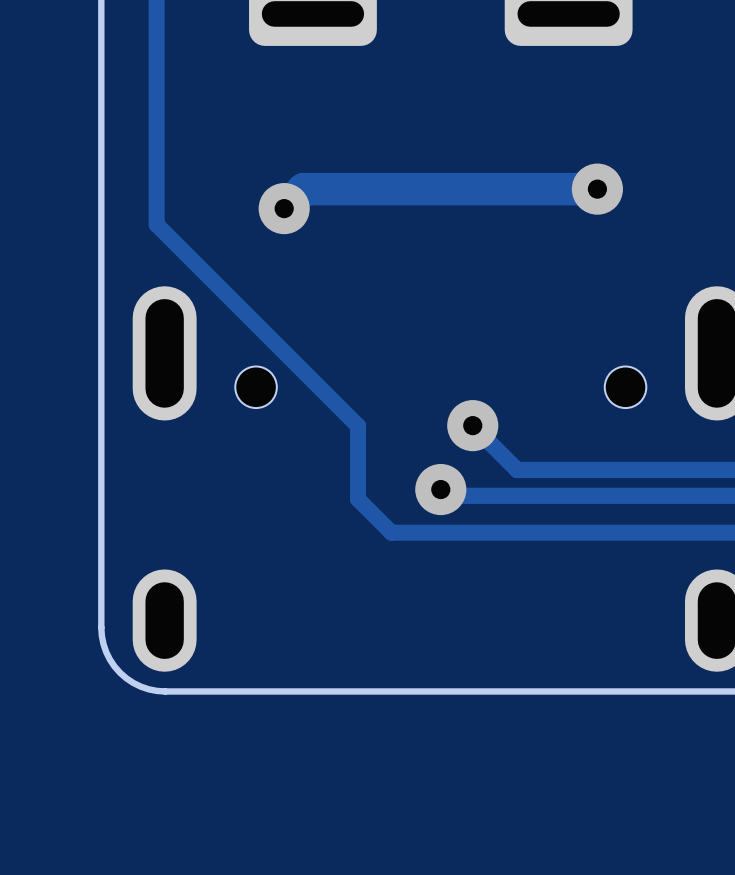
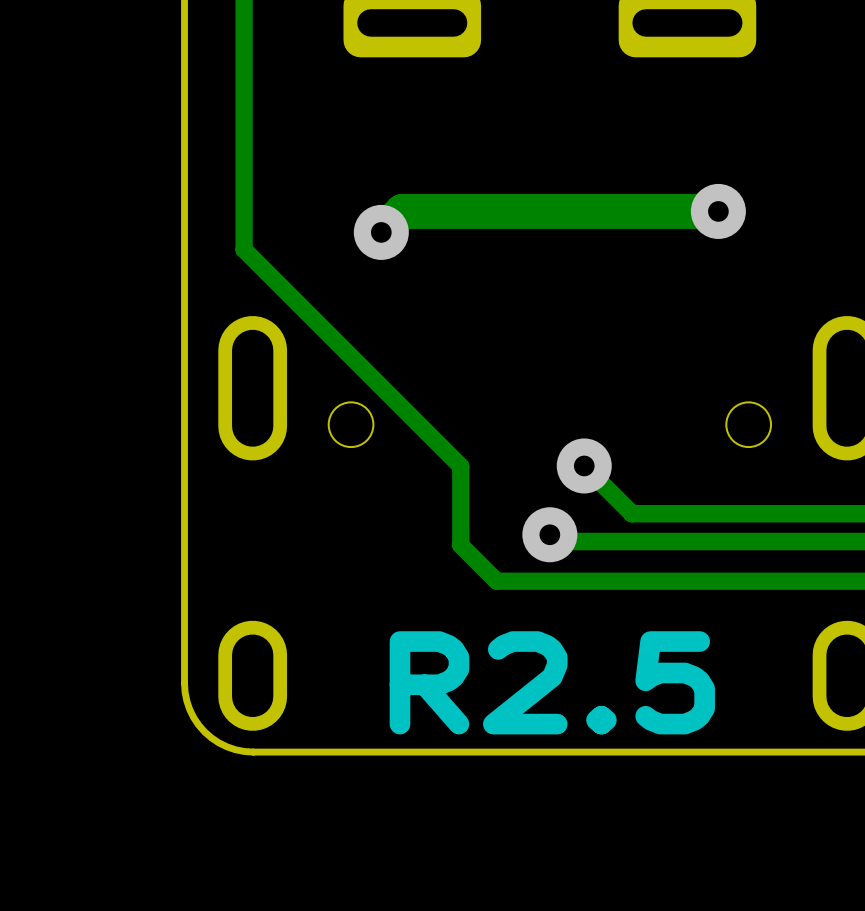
text: none -> R2.5 (552, 682)

